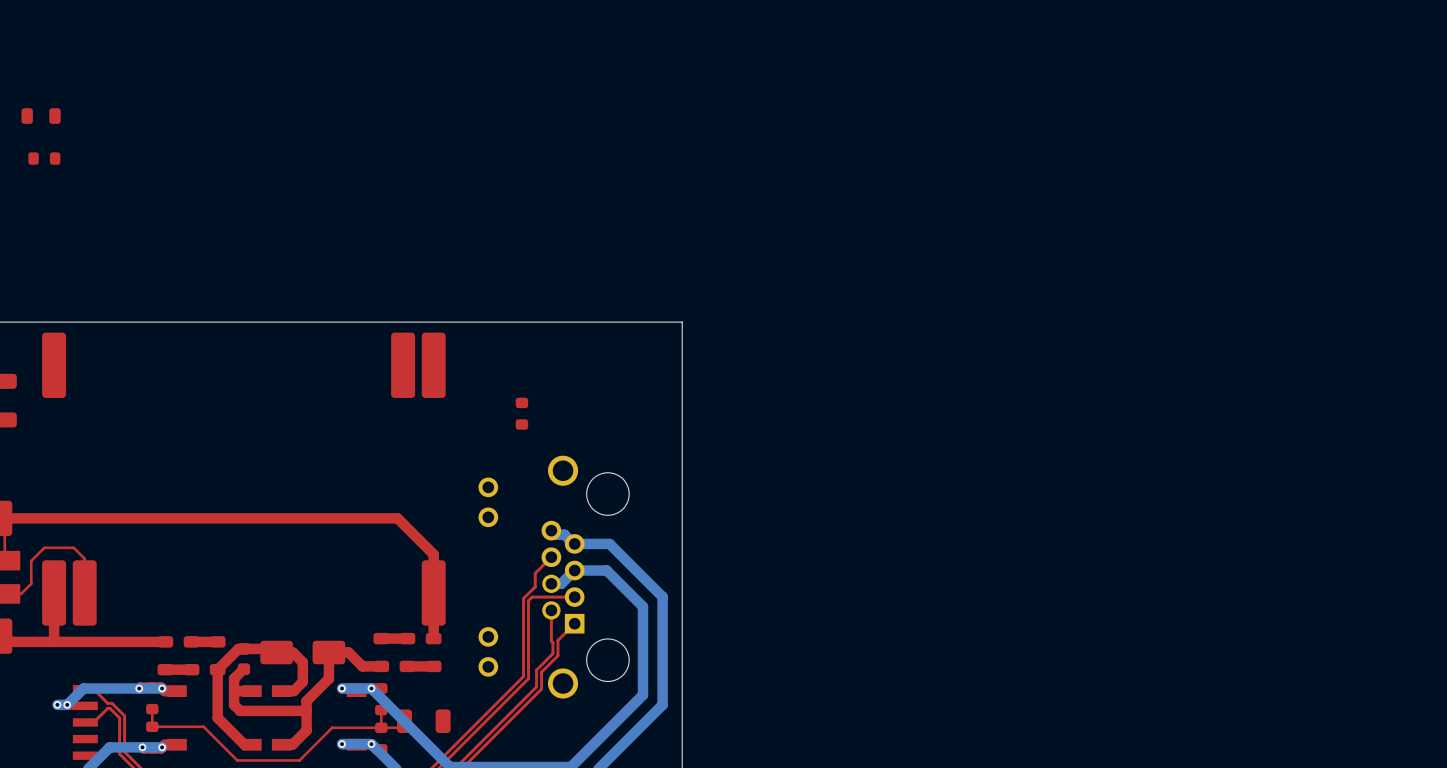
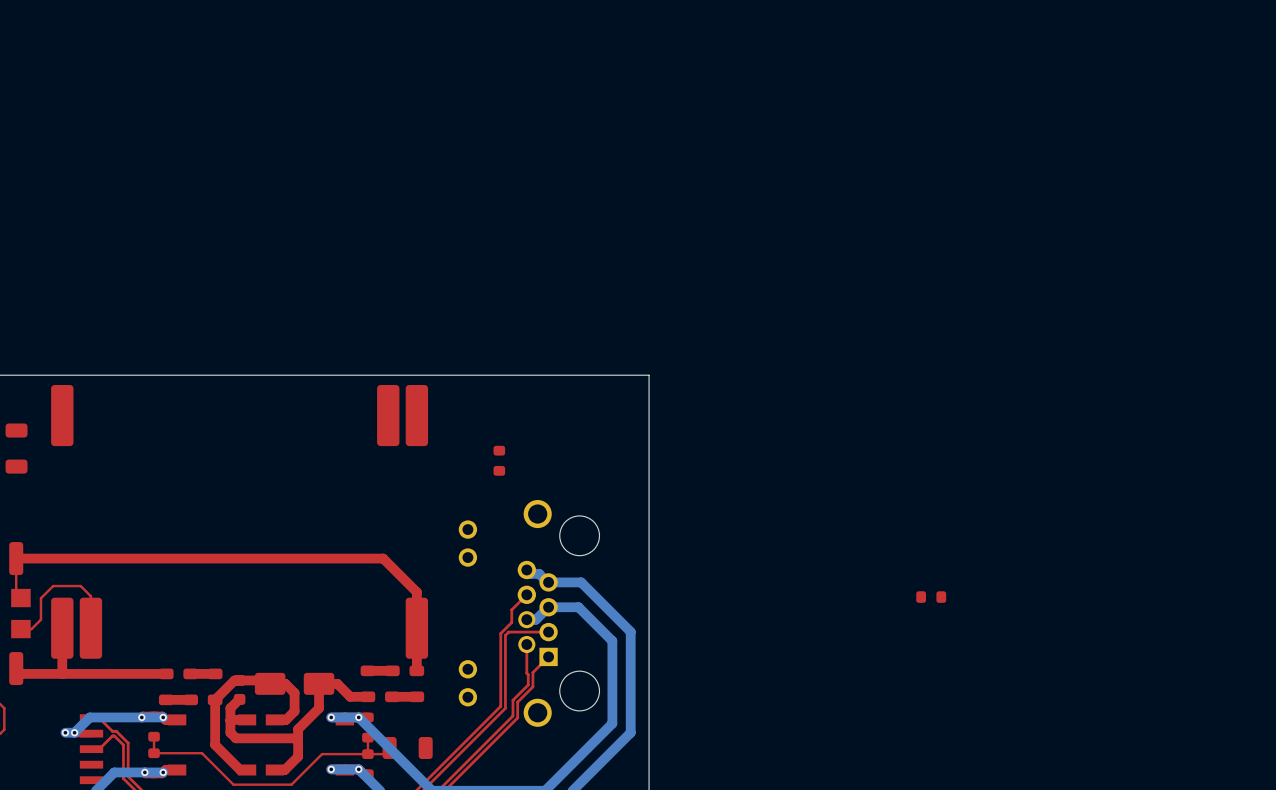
part: (41, 116) -> none
part: (44, 158) -> none
part: none -> (931, 597)

